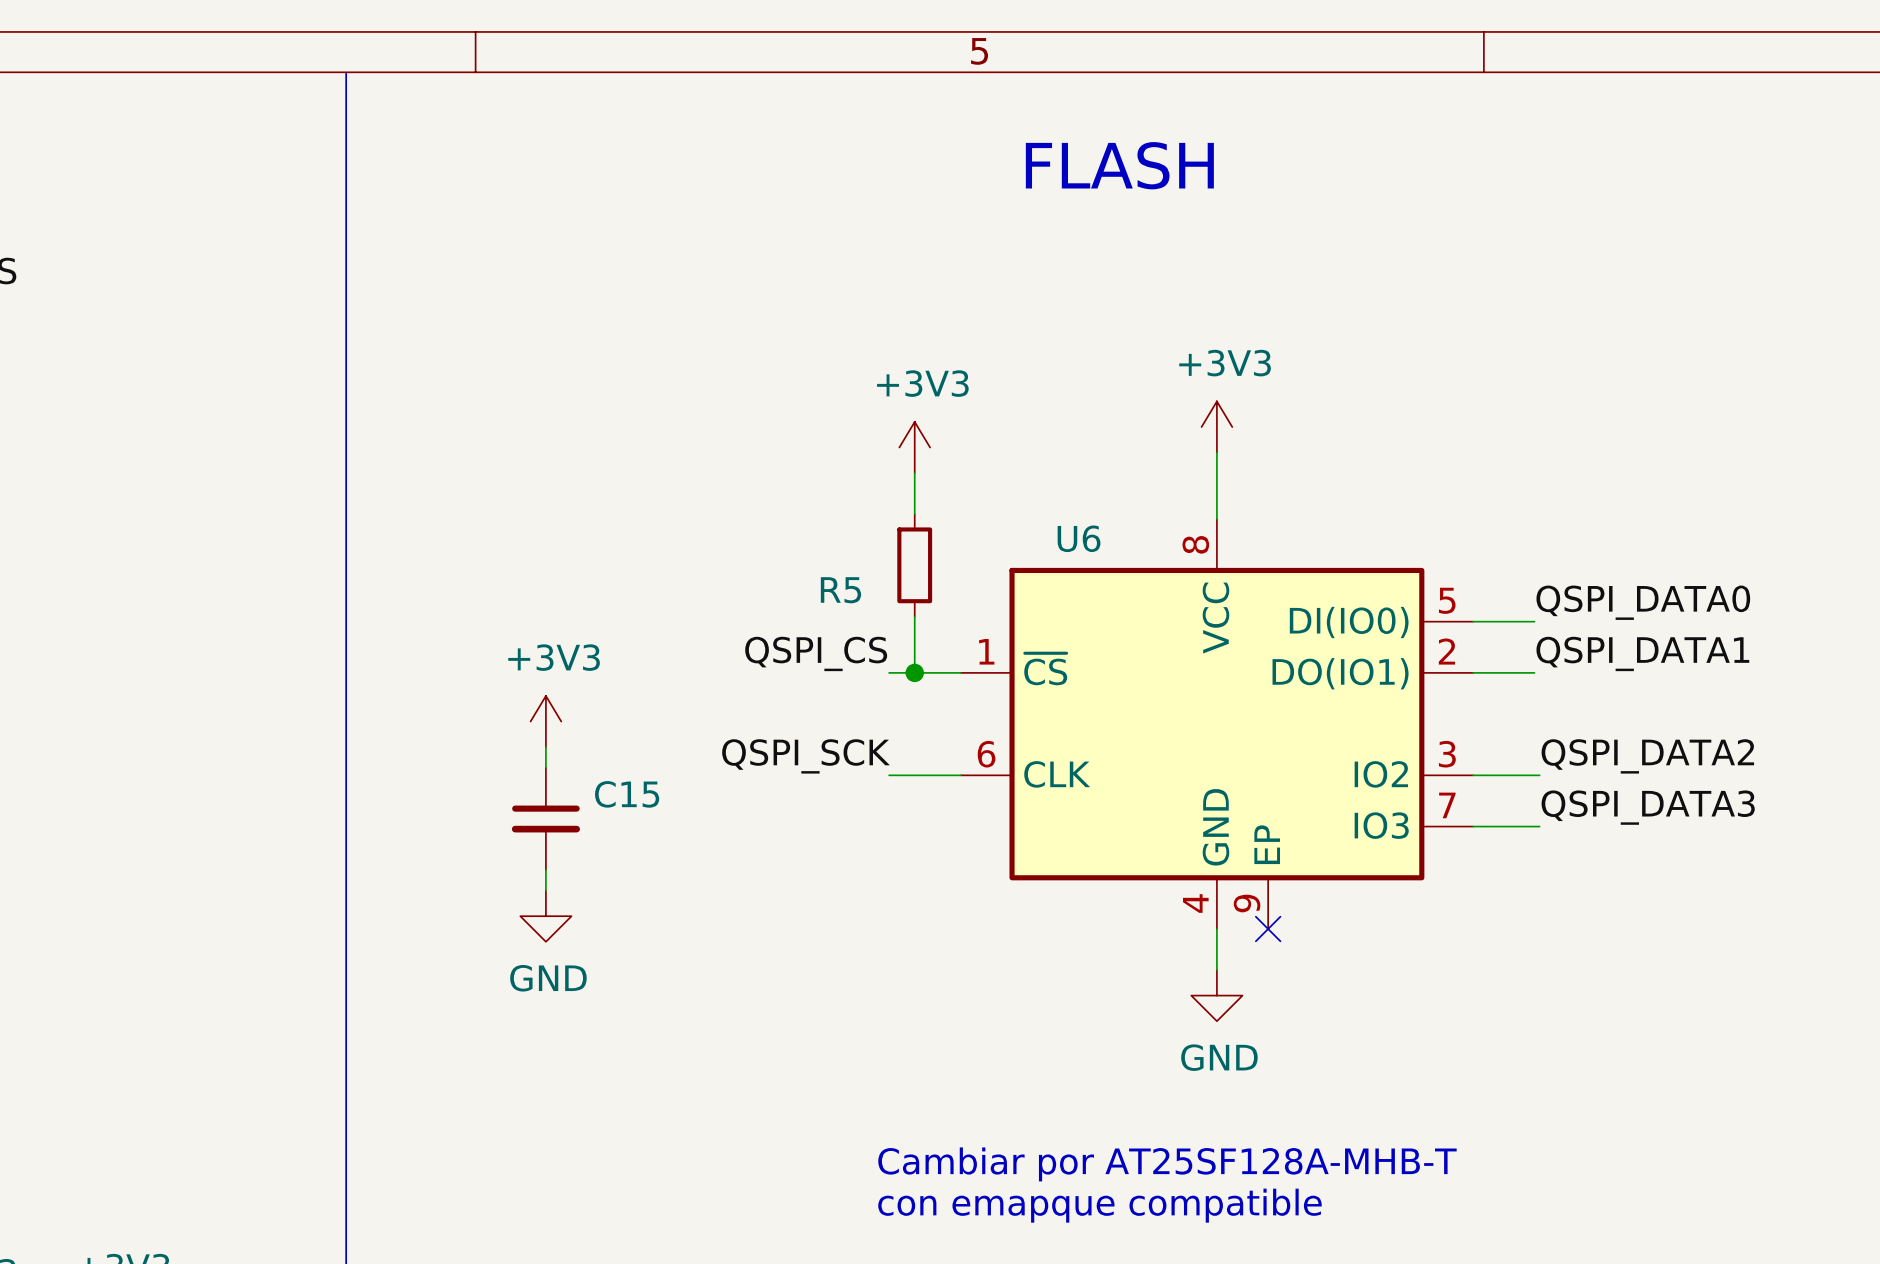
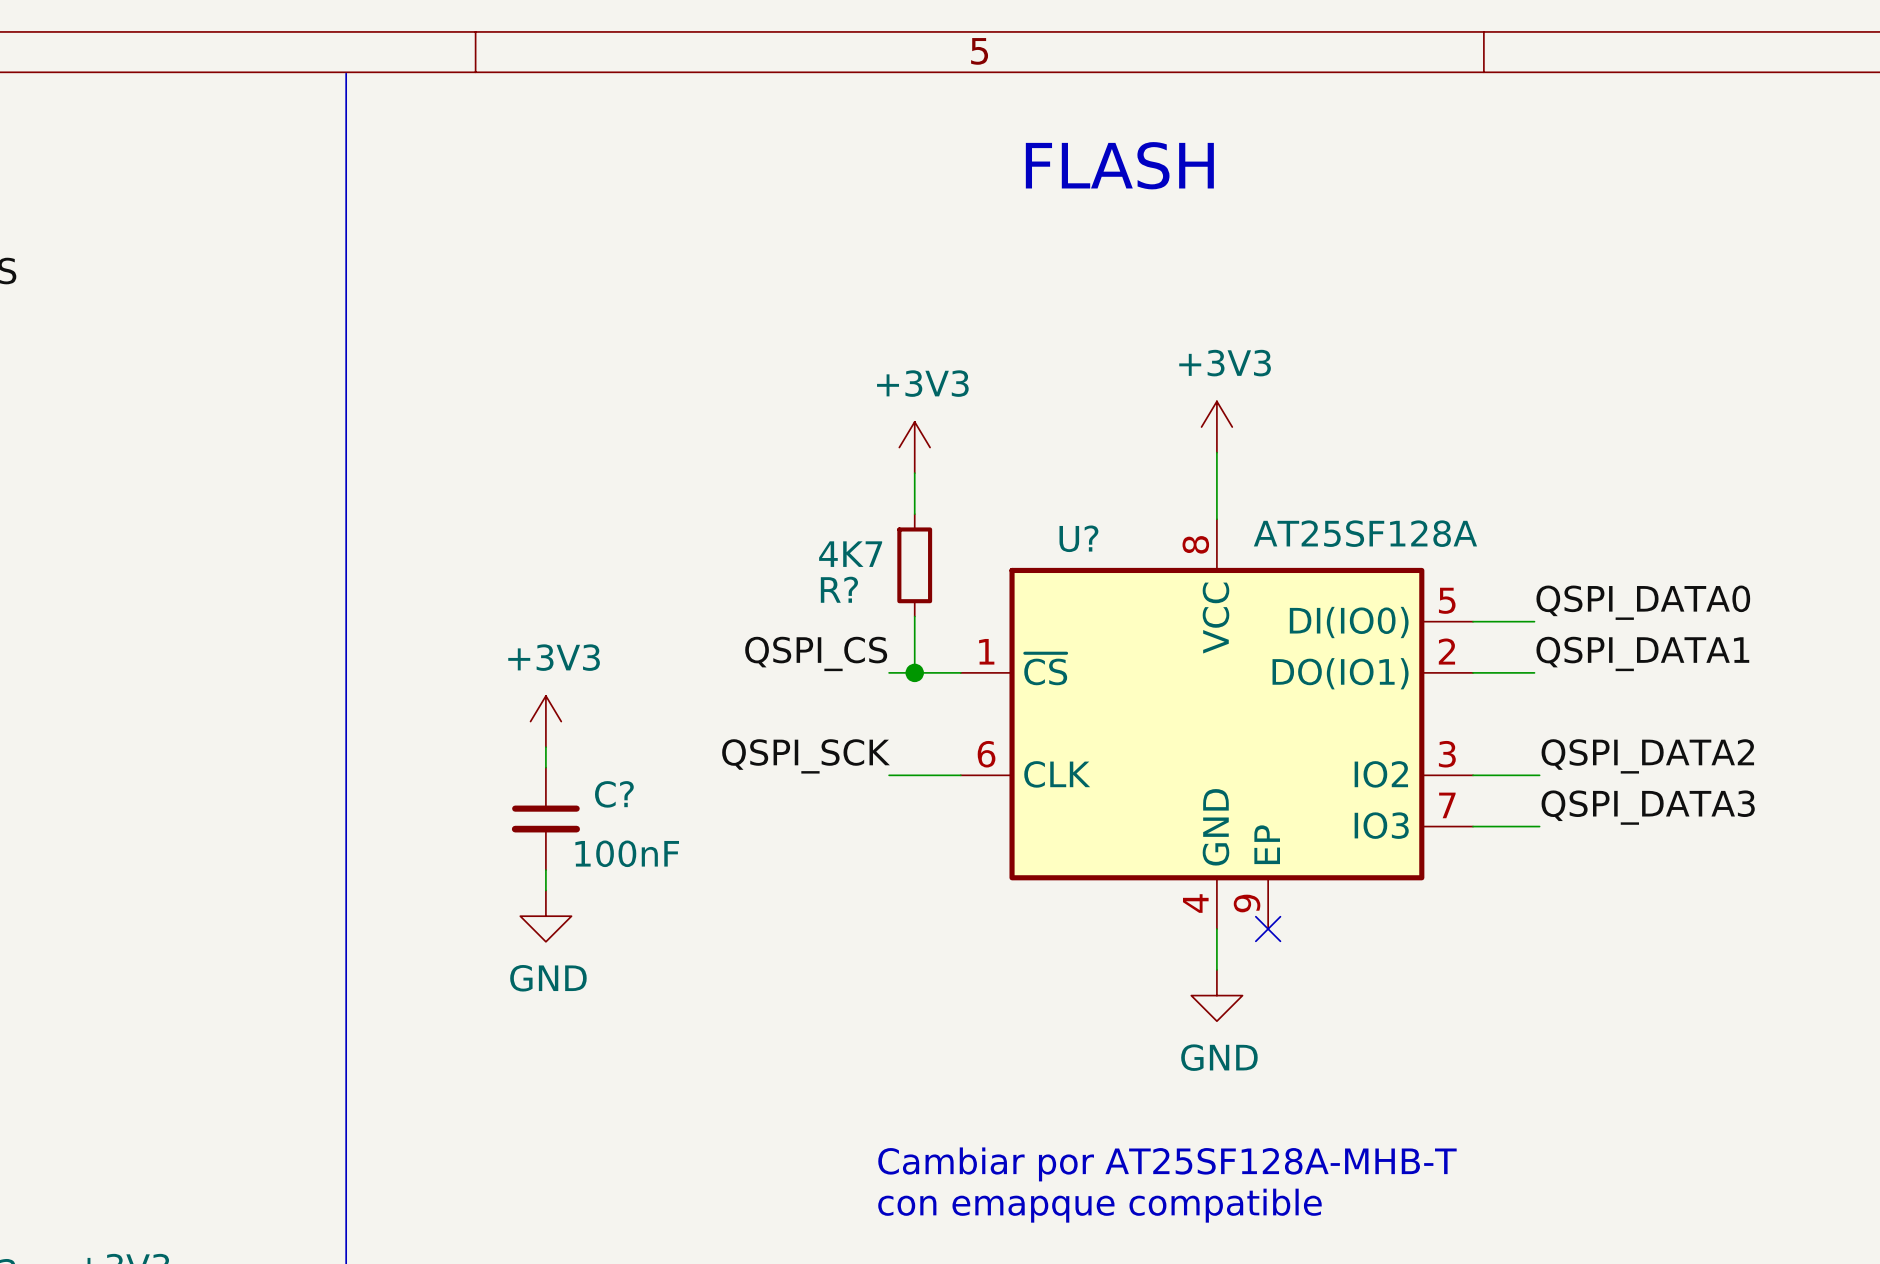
U6 value: none -> AT25SF128A (1365, 533)
U6 name: U6 (1079, 538) -> U? (1078, 538)
R5 value: none -> 4K7 (850, 554)
R5 name: R5 (840, 590) -> R? (839, 589)
C15 name: C15 (627, 794) -> C? (614, 794)
C15 value: none -> 100nF (627, 853)

